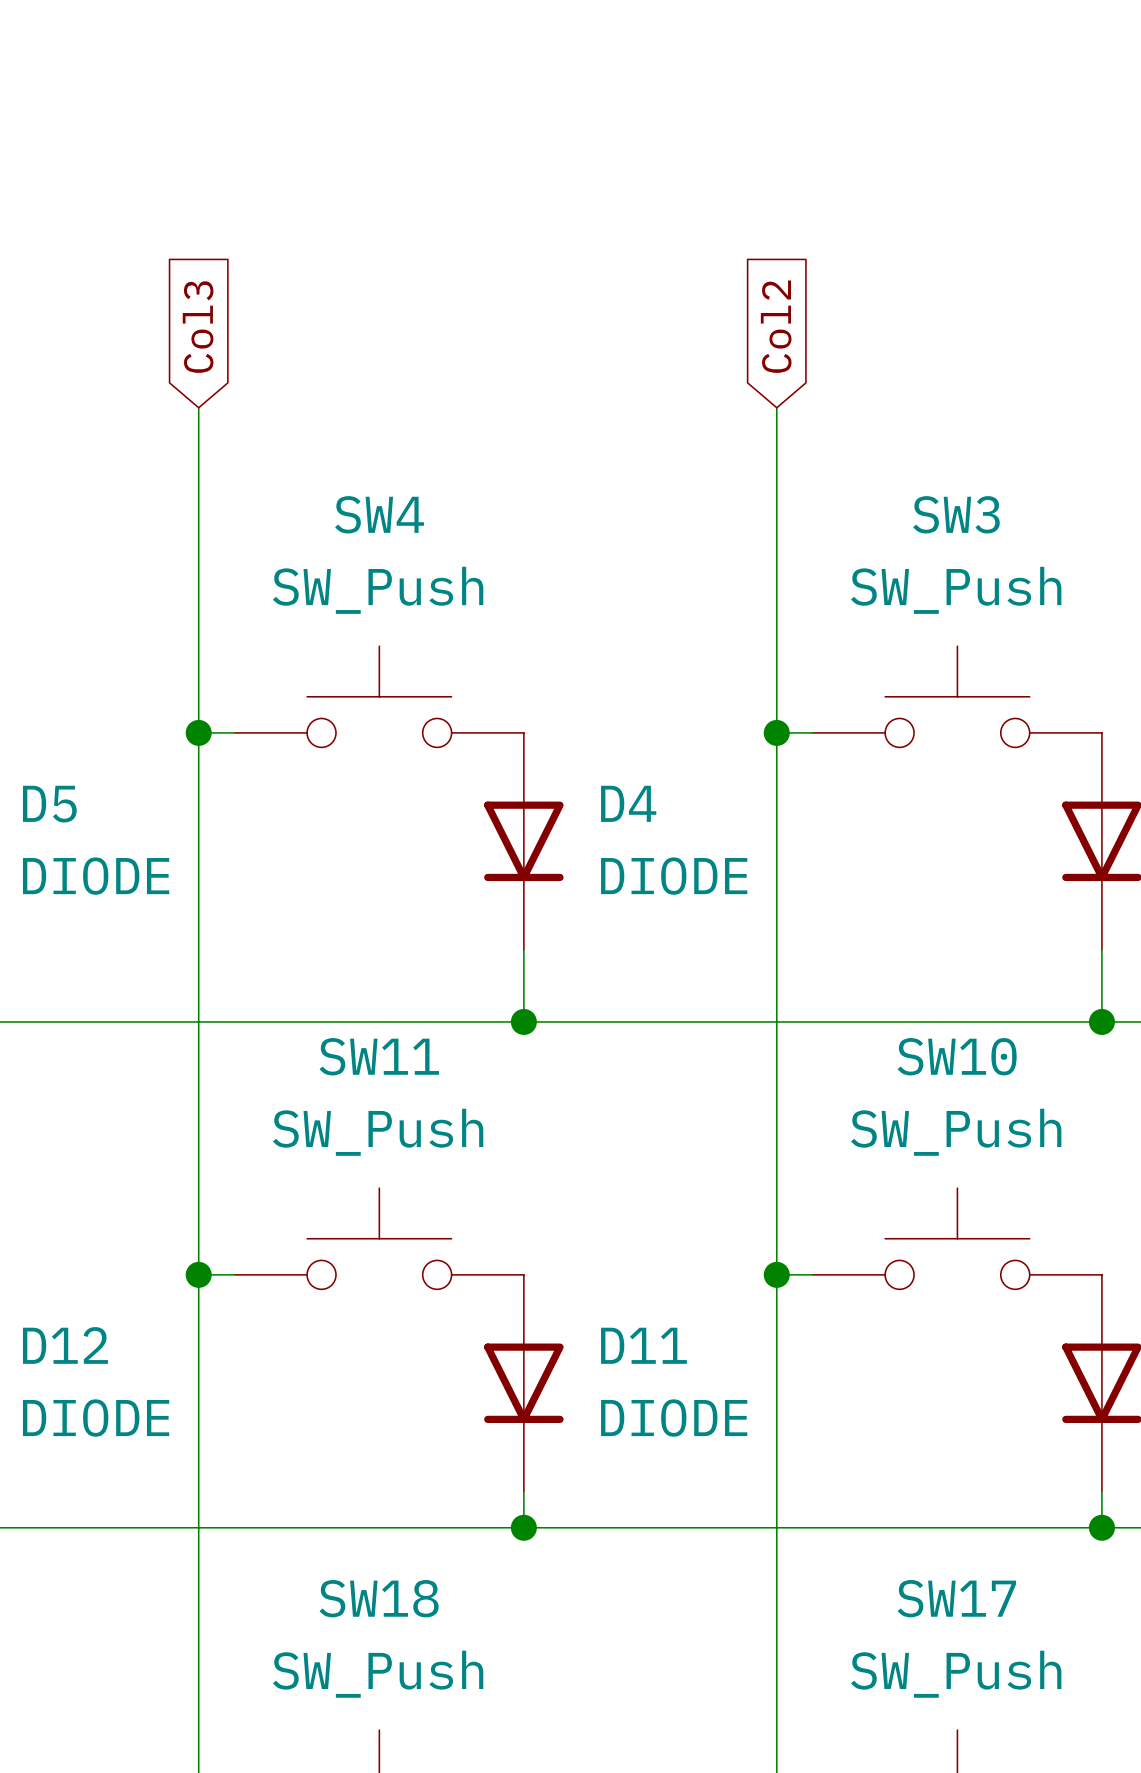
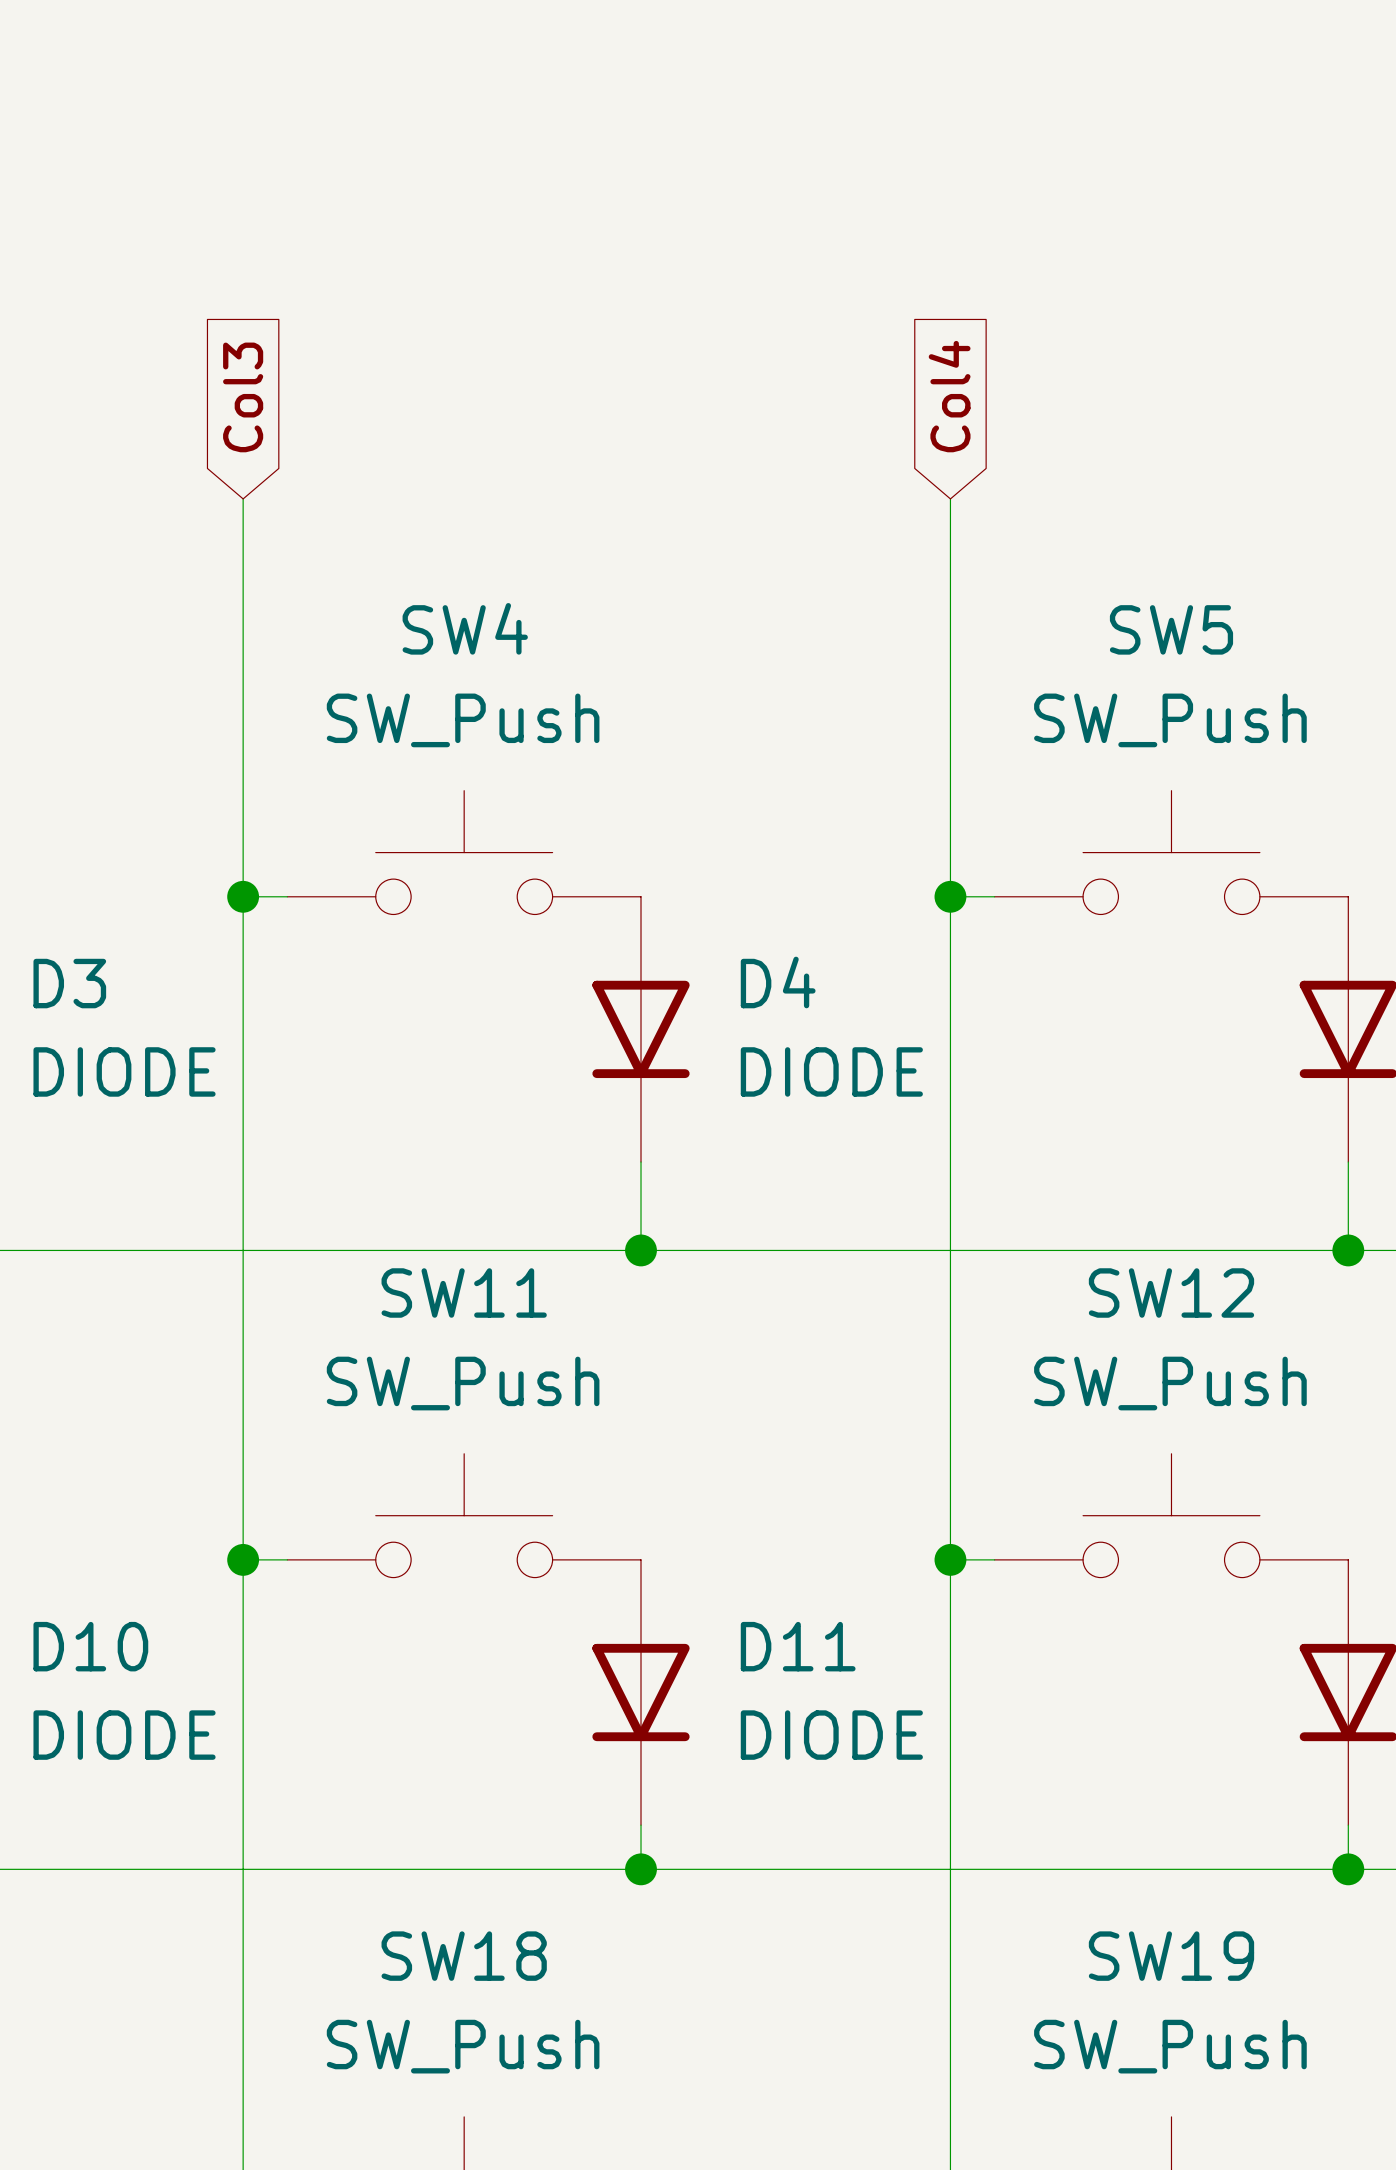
global label: Col2 (776, 326) -> Col4 (949, 396)
SW3 name: SW3 (956, 514) -> SW5 (1171, 629)
D5 name: D5 (49, 804) -> D3 (69, 983)
SW10 name: SW10 (957, 1056) -> SW12 (1171, 1293)
D12 name: D12 (65, 1345) -> D10 (90, 1646)
SW17 name: SW17 (956, 1598) -> SW19 (1171, 1956)

